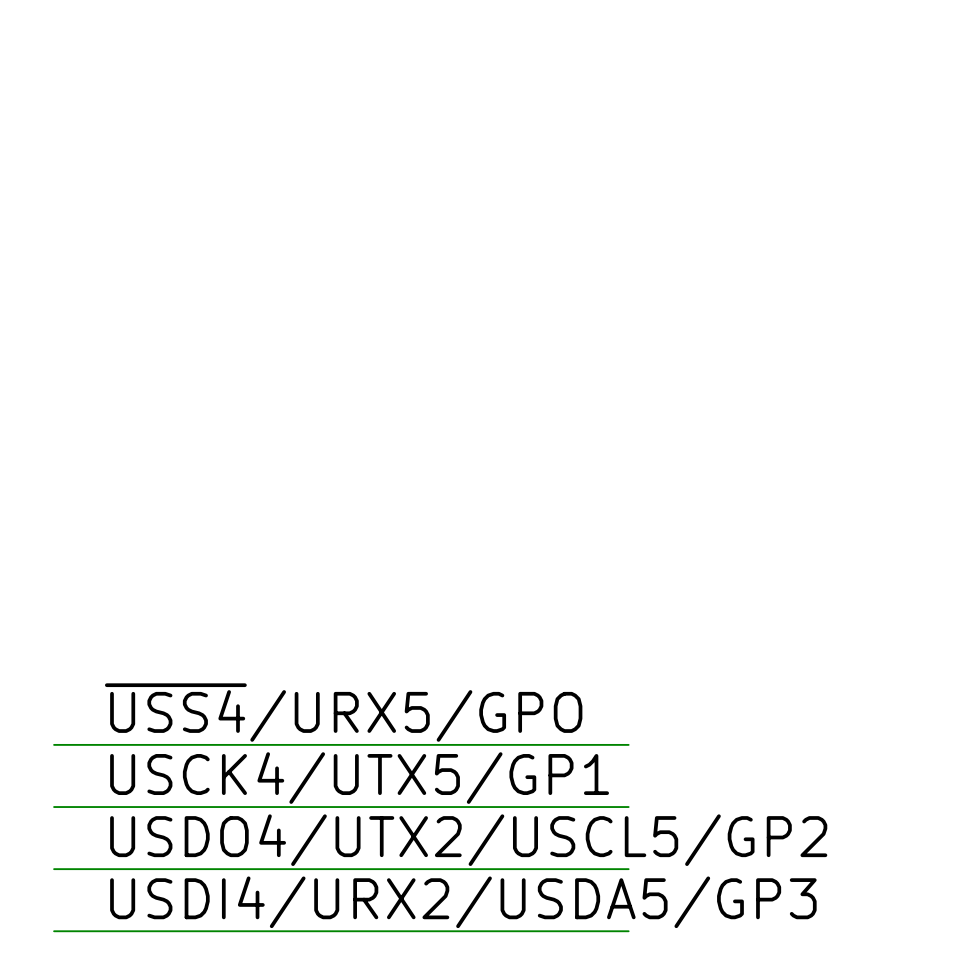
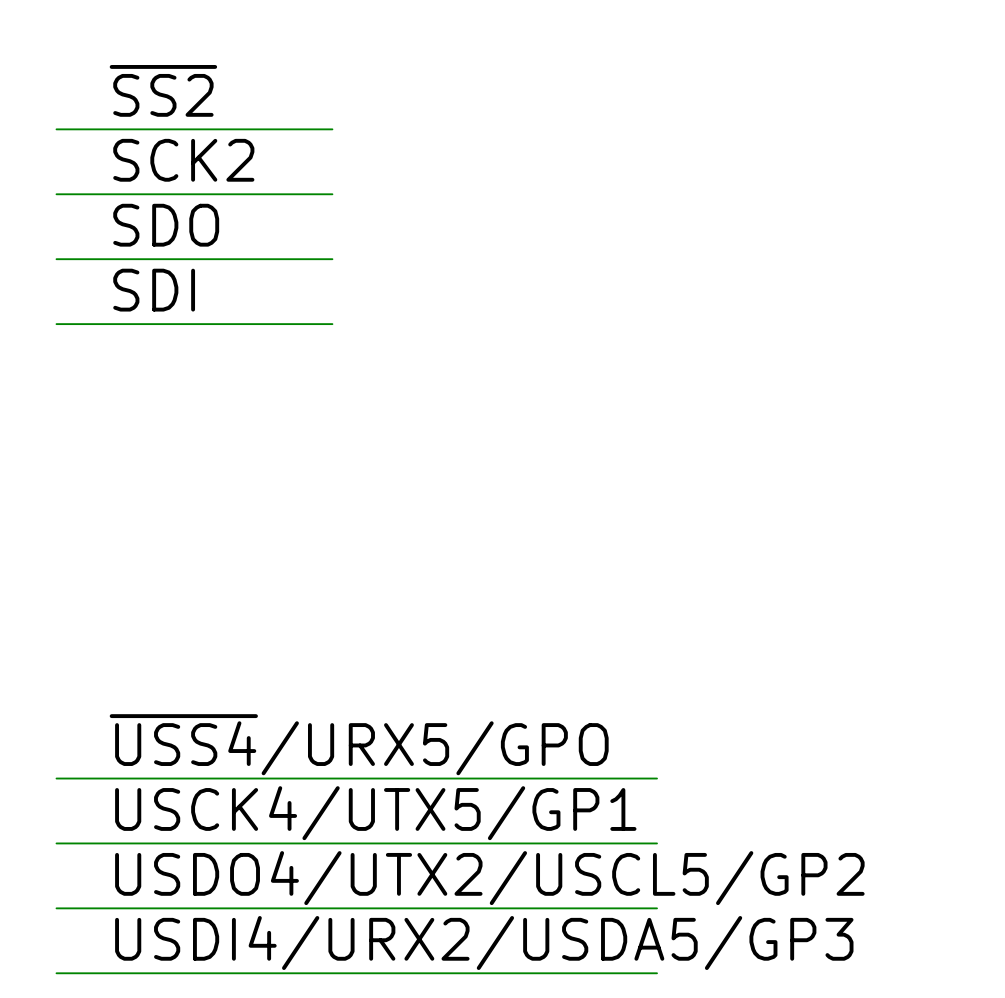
label: none -> ~{SS2} (163, 90)
wire: none -> (56, 129) (332, 129)
label: none -> SCK2 (183, 160)
wire: none -> (56, 194) (332, 194)
label: none -> SDO (166, 225)
wire: none -> (56, 259) (332, 259)
label: none -> SDI (154, 290)
wire: none -> (56, 324) (332, 324)

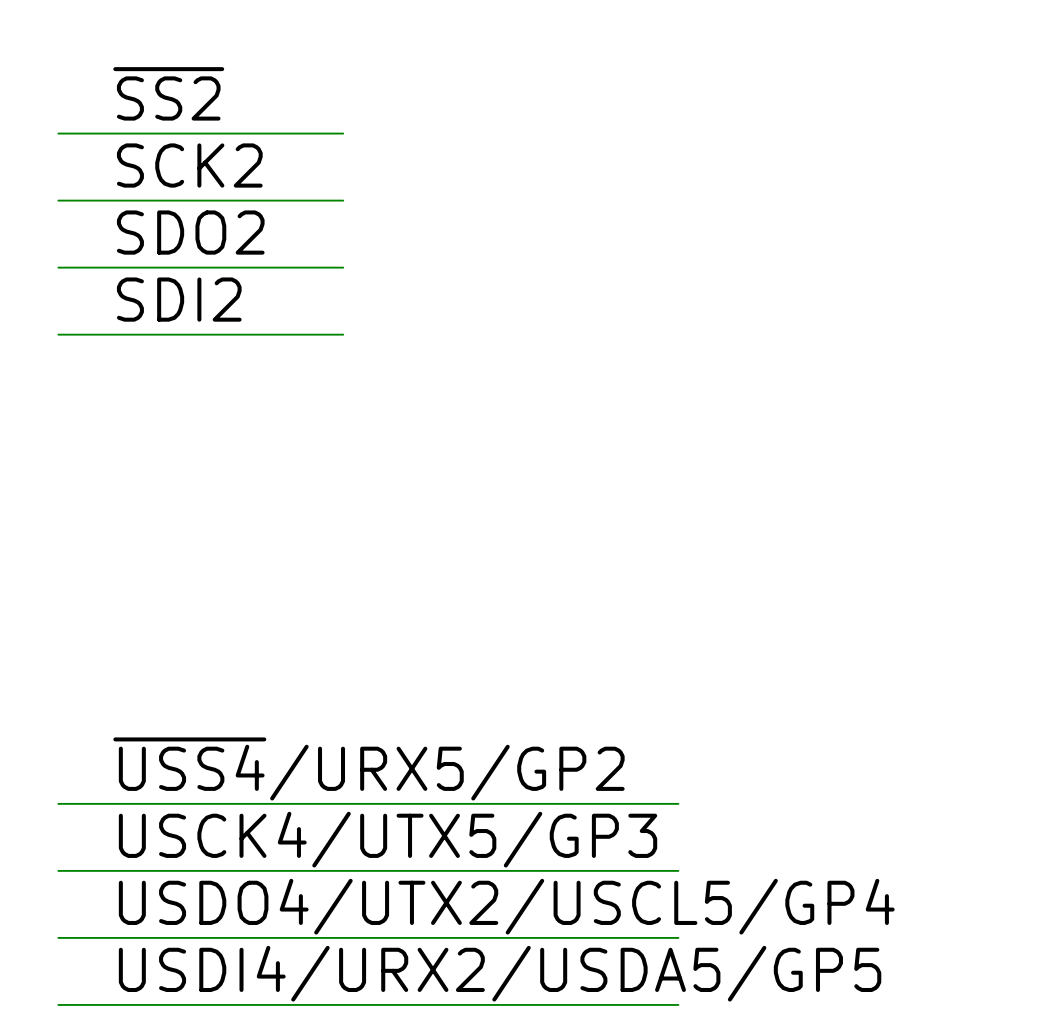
label: SDO (166, 225) -> SDO2 (190, 232)
label: SDI (154, 290) -> SDI2 (179, 299)
label: ~{USS4}/URX5/GPO (359, 744) -> ~{USS4}/URX5/GP2 (368, 768)
label: USCK4/UTX5/GP1 (375, 813) -> USCK4/UTX5/GP3 (388, 839)
label: USDO4/UTX2/USCL5/GP2 (489, 878) -> USDO4/UTX2/USCL5/GP4 (506, 906)
label: USDI4/URX2/USDA5/GP3 (484, 943) -> USDI4/URX2/USDA5/GP5 (500, 973)

